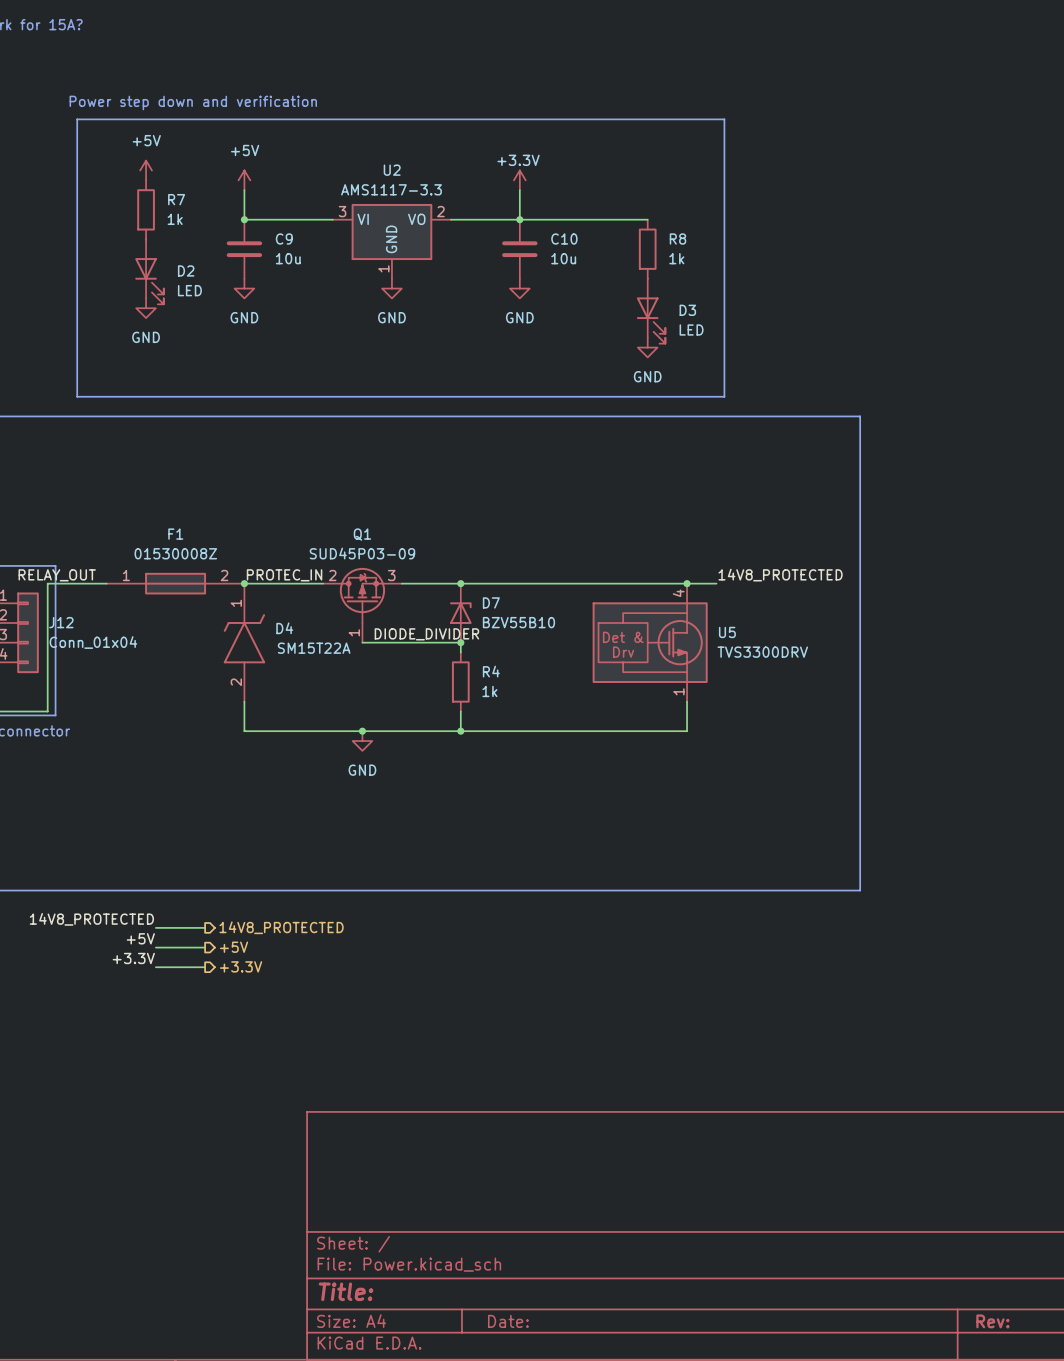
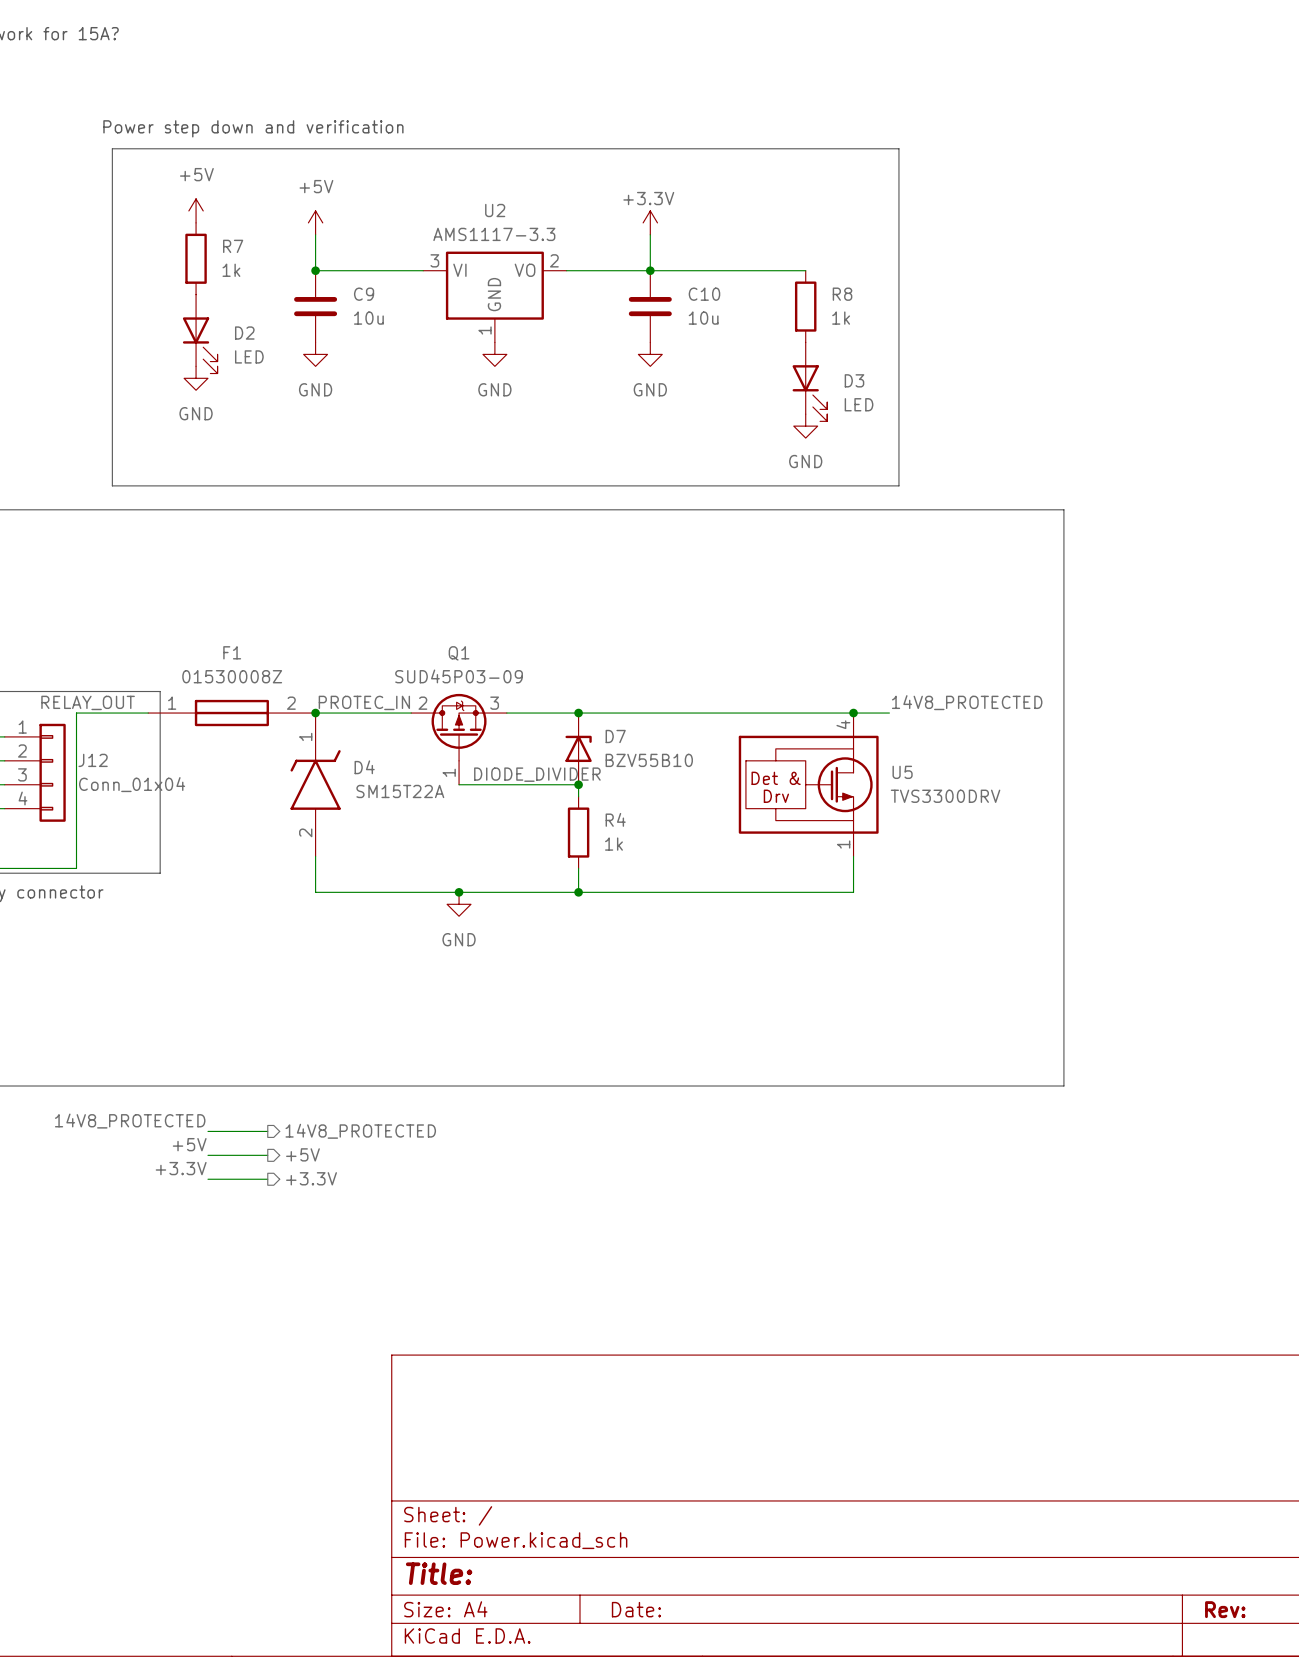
line: (55, 565) (55, 715) -> (86, 691) (160, 691) (160, 873) (86, 873)

